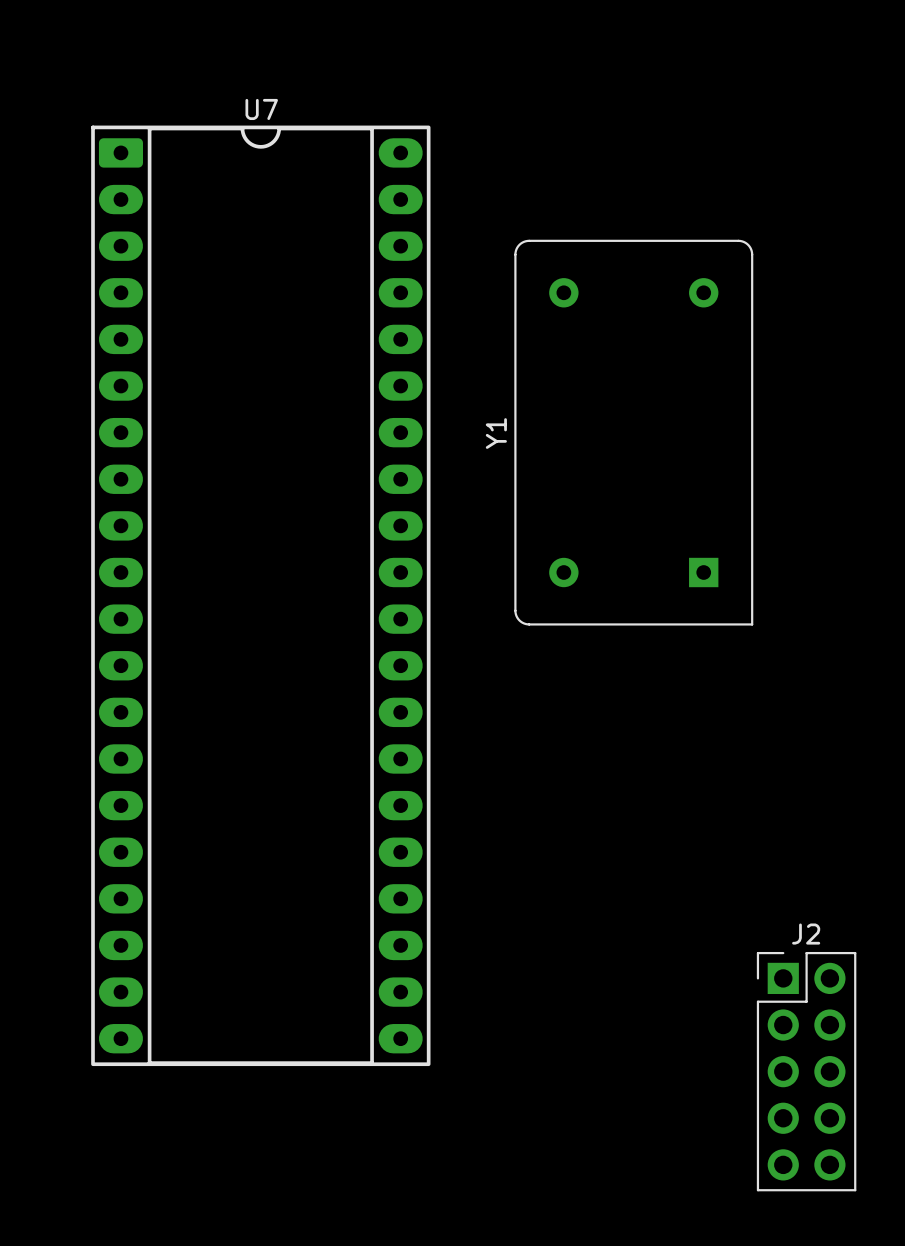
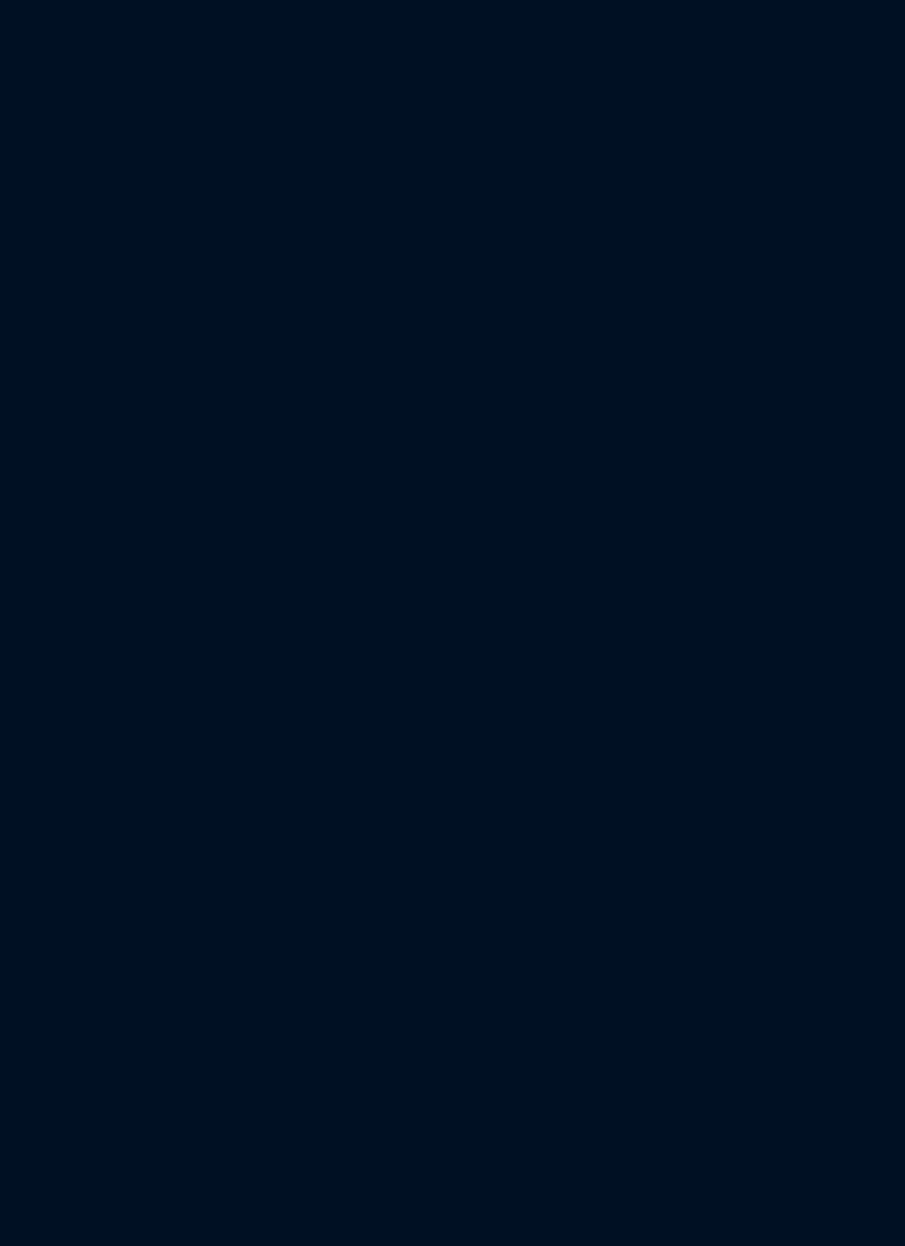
Y1: (633, 432) -> none
U7: (260, 595) -> none
J2: (806, 1071) -> none

